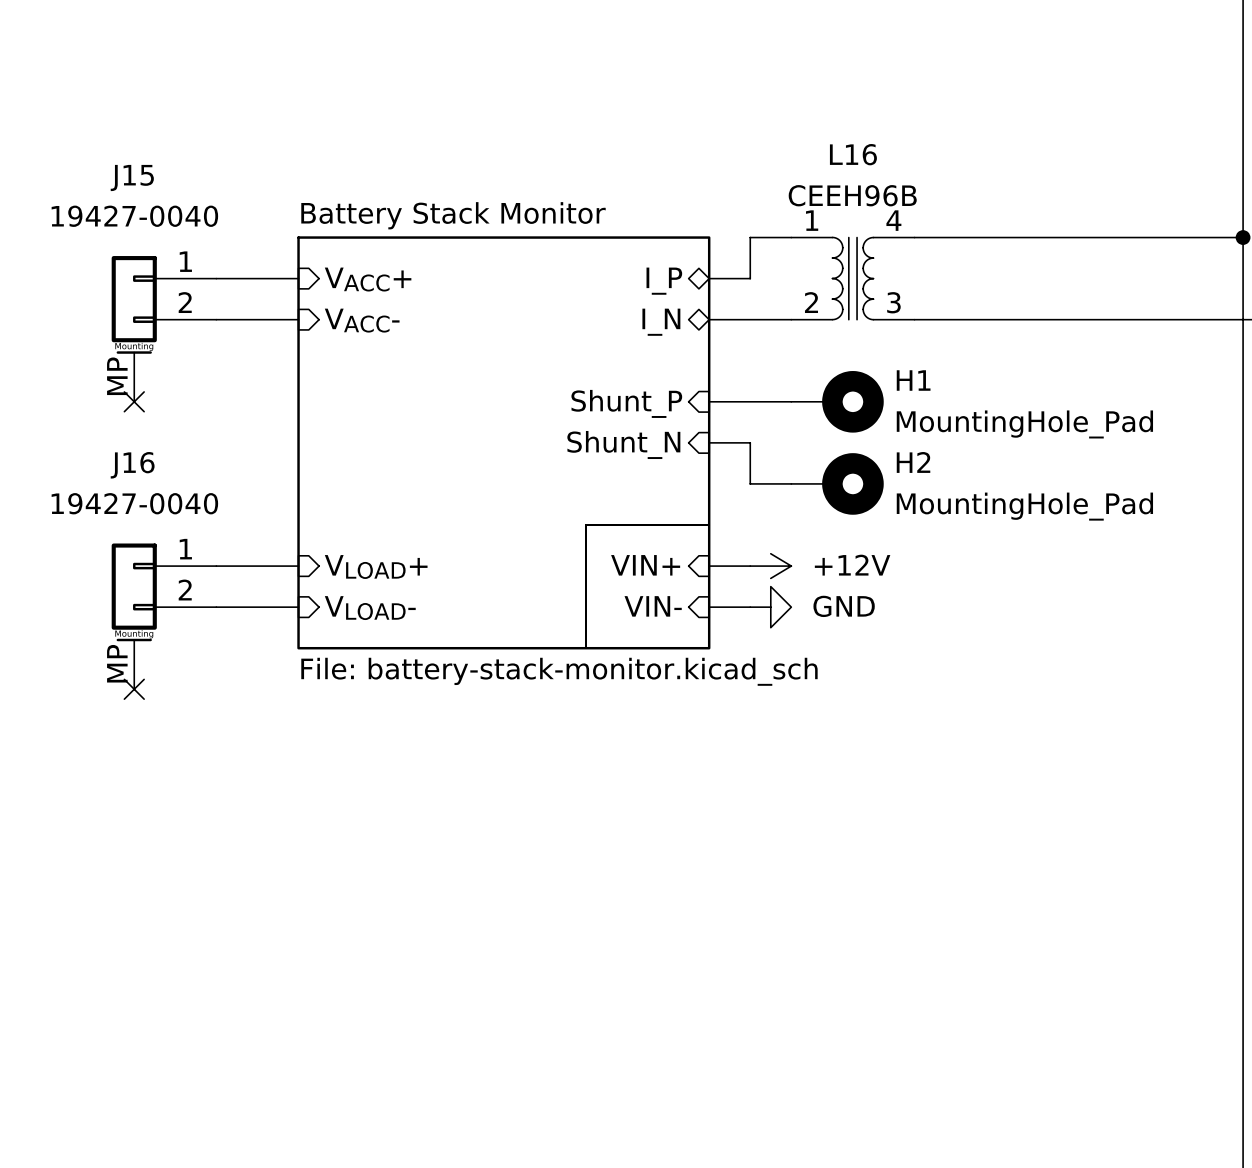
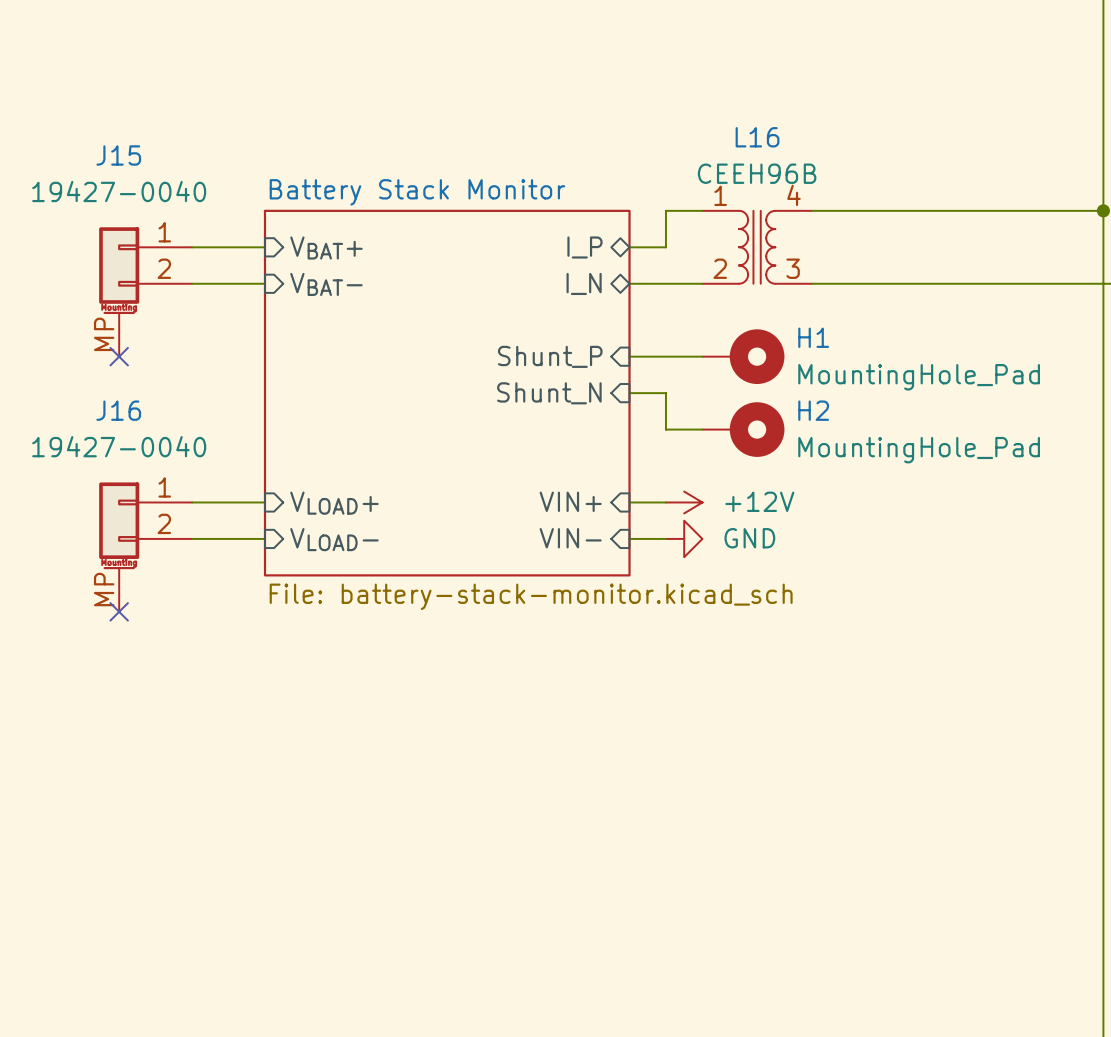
sheet pin: VACC+ (368, 279) -> VBAT+ (326, 247)
sheet pin: VACC- (362, 320) -> VBAT- (326, 284)
line: (709, 525) (585, 525) (585, 648) -> none

